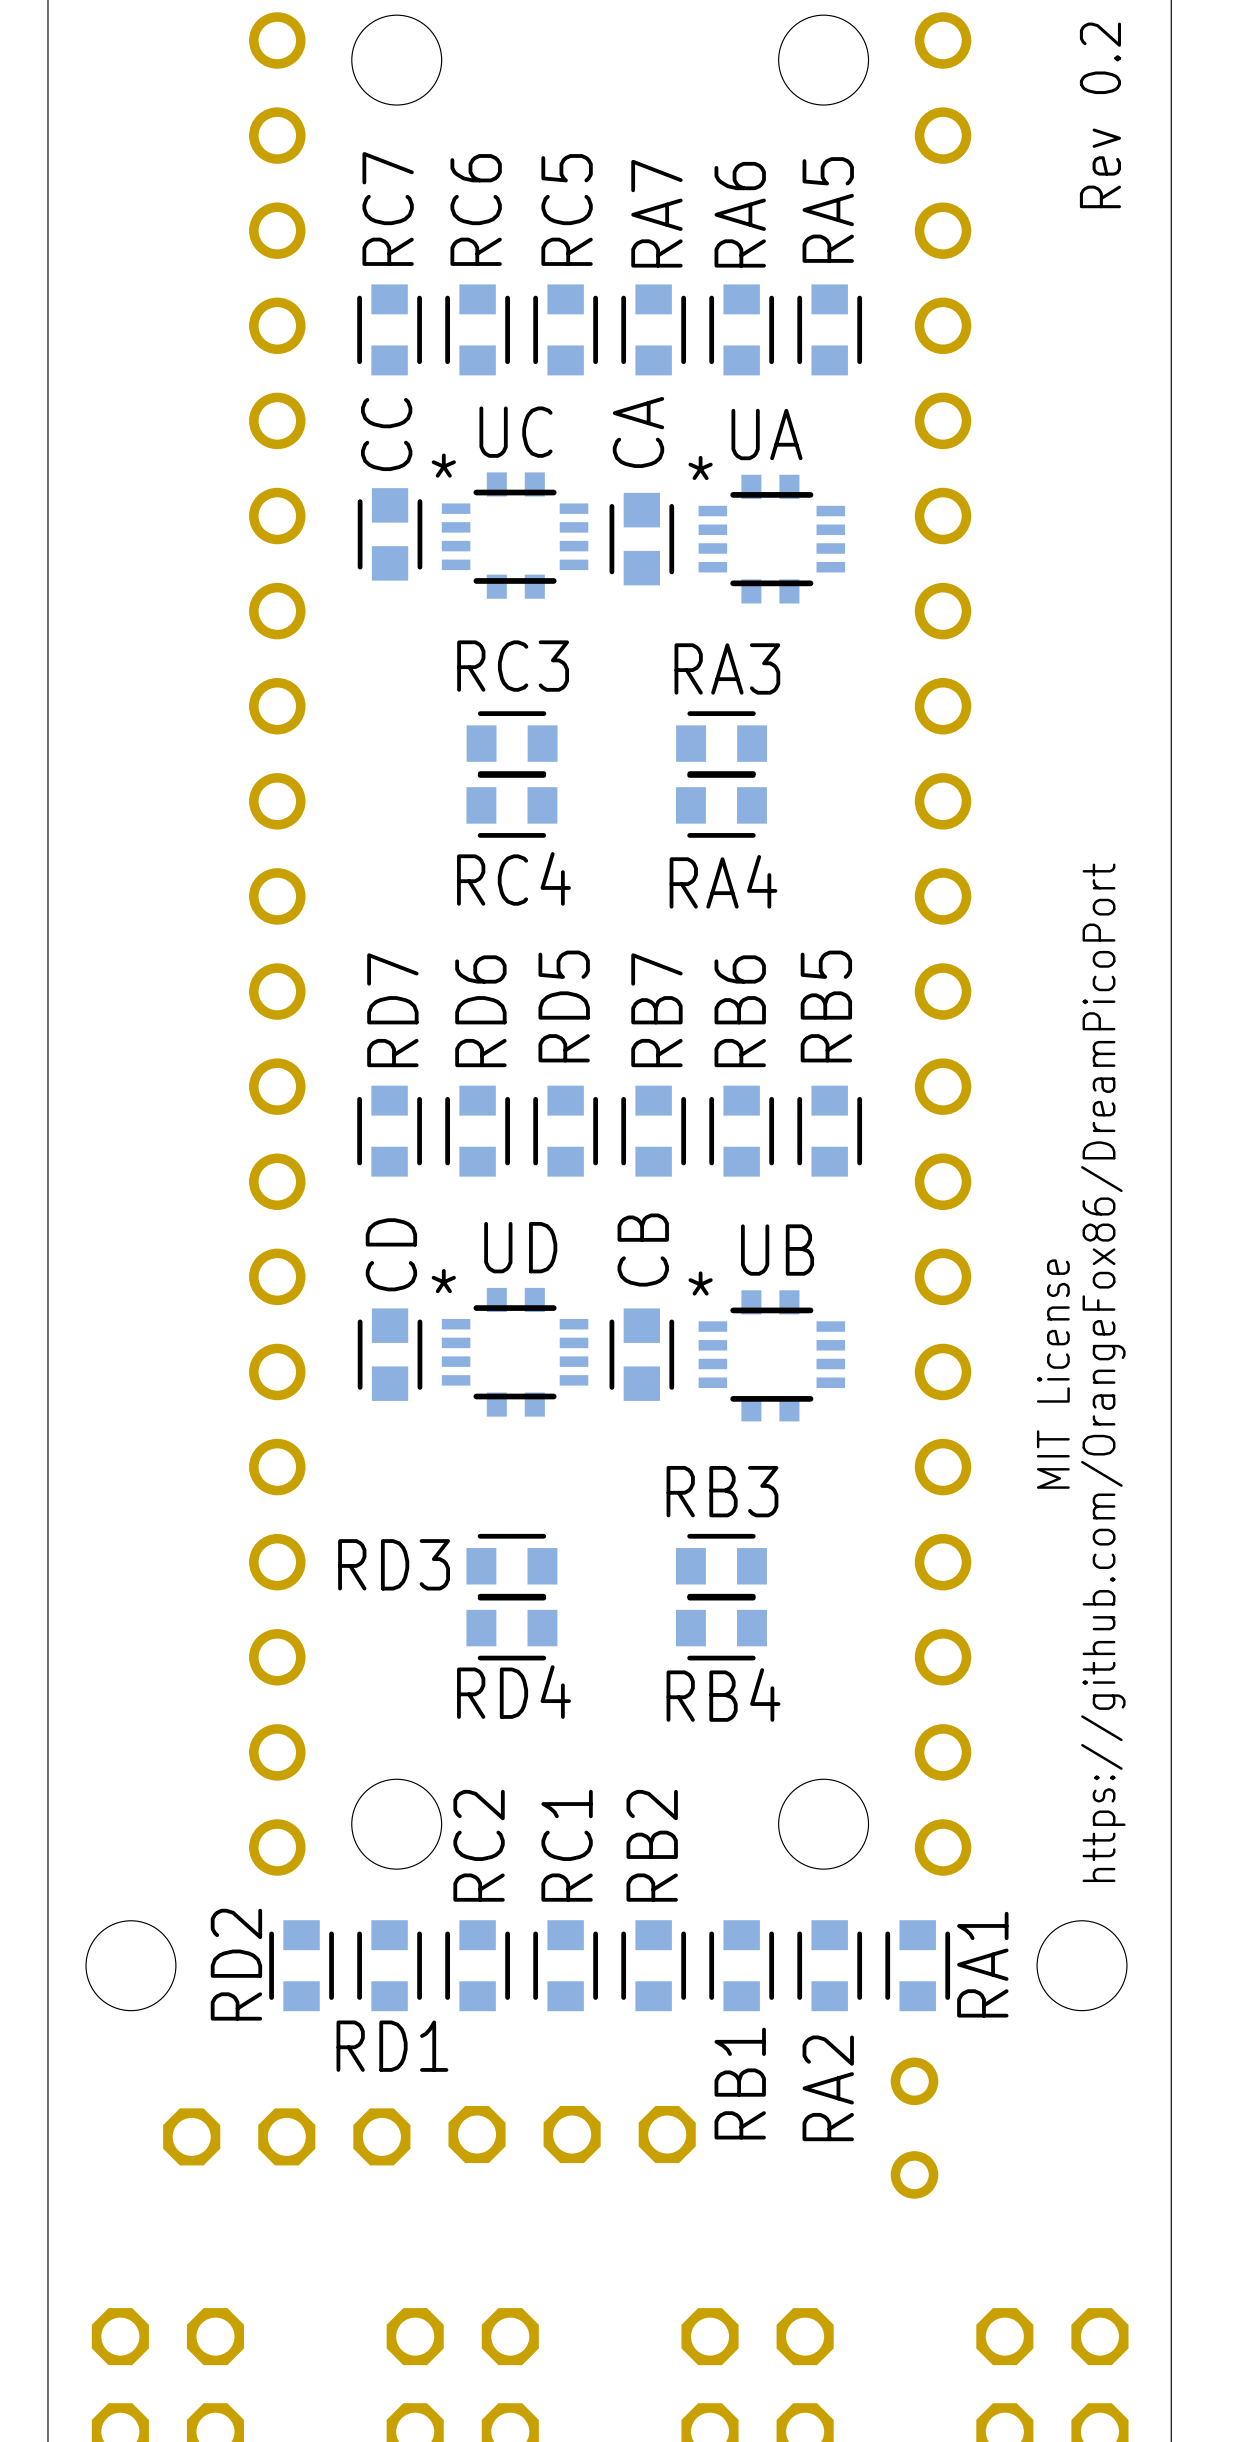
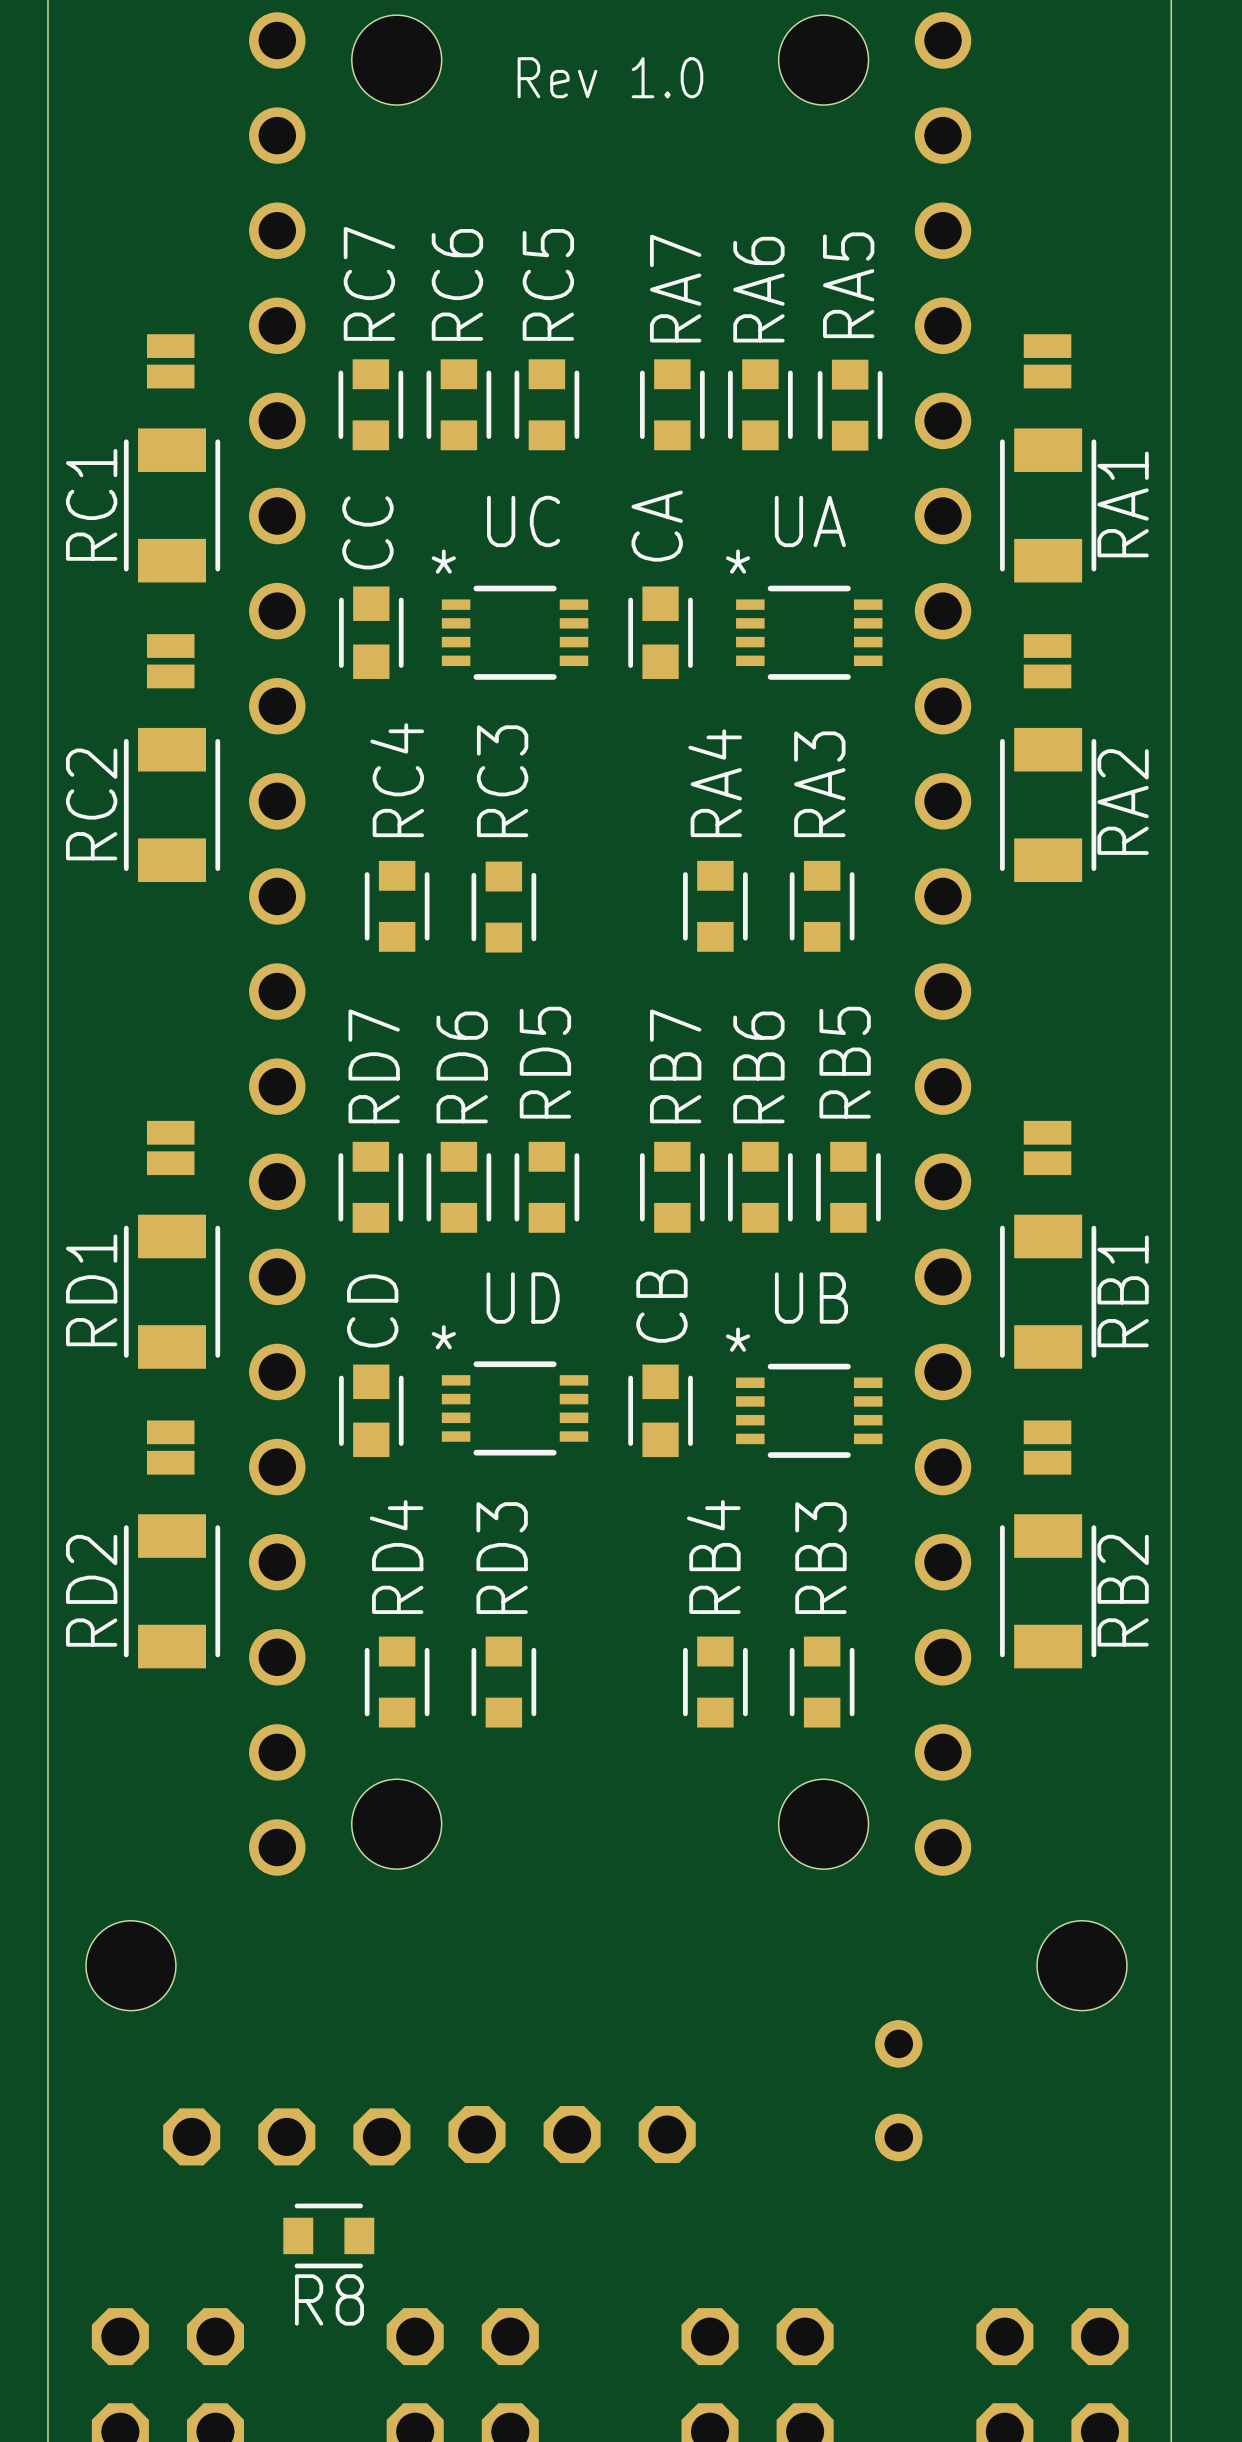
text: none -> Rev 1.0 (610, 77)
text: Rev 0.2 (1100, 115) -> none
RC7 position: (389, 329) -> (370, 404)
RC6 position: (477, 329) -> (458, 404)
RC5 position: (565, 329) -> (546, 404)
RA7 position: (653, 329) -> (672, 404)
RA6 position: (741, 329) -> (760, 404)
RA5 position: (829, 329) -> (850, 405)
part: none -> (170, 361)
part: none -> (1047, 361)
UC name position: UC (515, 432) -> UC (523, 521)
UA name position: UA (767, 434) -> UA (810, 521)
part: (515, 484) -> none
part: (770, 486) -> none
CC position: (390, 534) -> (371, 632)
UC position: (515, 536) -> (515, 632)
CA position: (641, 539) -> (660, 632)
UA position: (771, 539) -> (809, 632)
part: (515, 586) -> none
part: (770, 591) -> none
part: none -> (170, 661)
part: none -> (1047, 661)
RC3 rotation: 0° (512, 743) -> 90° clockwise (503, 907)
RC3 position: (512, 743) -> (503, 907)
RA3 rotation: 0° (721, 743) -> 90° clockwise (822, 906)
RA3 position: (721, 743) -> (822, 906)
RC4 rotation: 0° (511, 805) -> 90° clockwise (397, 906)
RC4 position: (511, 805) -> (397, 906)
RA4 rotation: 0° (721, 805) -> 90° clockwise (715, 906)
RA4 position: (721, 805) -> (715, 906)
RC4 name position: RC4 (513, 878) -> RC4 (397, 780)
RA4 name position: RA4 (723, 881) -> RA4 (715, 783)
RD7 position: (389, 1131) -> (370, 1187)
RD6 position: (477, 1131) -> (458, 1187)
RD5 position: (565, 1131) -> (546, 1187)
RB7 position: (653, 1131) -> (672, 1187)
RB6 position: (741, 1131) -> (760, 1187)
RB5 position: (829, 1131) -> (848, 1187)
part: none -> (170, 1147)
part: none -> (1047, 1147)
UD name position: UD (520, 1247) -> UD (523, 1298)
UB name position: UB (777, 1250) -> UB (811, 1298)
part: (515, 1299) -> none
part: (770, 1302) -> none
UD position: (515, 1352) -> (515, 1408)
CD position: (390, 1354) -> (371, 1410)
CB position: (641, 1354) -> (660, 1410)
UB position: (771, 1354) -> (809, 1410)
text: https://github.com/OrangeFox86/DreamPicoPort (1103, 1372) -> none
text: MIT License (1053, 1374) -> none
part: (515, 1404) -> none
part: (770, 1409) -> none
part: none -> (170, 1447)
part: none -> (1047, 1447)
RD3 rotation: 0° (511, 1566) -> 90° clockwise (503, 1682)
RD3 position: (511, 1566) -> (503, 1682)
RB3 rotation: 0° (721, 1566) -> 90° clockwise (822, 1682)
RB3 position: (721, 1566) -> (822, 1682)
RD4 rotation: 0° (511, 1628) -> 90° clockwise (397, 1682)
RD4 position: (511, 1628) -> (397, 1682)
RB4 rotation: 0° (721, 1628) -> 90° clockwise (715, 1682)
RD4 name position: RD4 (513, 1692) -> RD4 (396, 1557)
RB4 name position: RB4 (723, 1694) -> RB4 (713, 1557)
RC2 name position: RC2 (479, 1845) -> RC2 (91, 804)
RC1 name position: RC1 (567, 1845) -> RC1 (91, 504)
RB2 name position: RB2 (652, 1845) -> RB2 (1123, 1590)
RD2 footprint: [269, 1920, 334, 2012] -> [123, 1514, 221, 1669]
RD1 footprint: [357, 1920, 422, 2012] -> [123, 1214, 221, 1369]
RC2 footprint: [445, 1920, 510, 2012] -> [123, 727, 221, 883]
RC1 footprint: [533, 1920, 598, 2012] -> [123, 428, 221, 583]
RB2 footprint: [621, 1920, 687, 2012] -> [1000, 1514, 1097, 1669]
RB1 footprint: [709, 1920, 775, 2012] -> [1000, 1214, 1097, 1369]
RA2 footprint: [797, 1920, 863, 2012] -> [1000, 727, 1097, 883]
RA1 footprint: [885, 1920, 951, 2012] -> [1000, 428, 1097, 583]
RD1 name position: RD1 (392, 2046) -> RD1 (91, 1290)
RB1 name position: RB1 (740, 2083) -> RB1 (1123, 1291)
RA2 name position: RA2 (828, 2088) -> RA2 (1123, 802)
part position: (914, 2128) -> (898, 2090)
R8: none -> (328, 2235)

